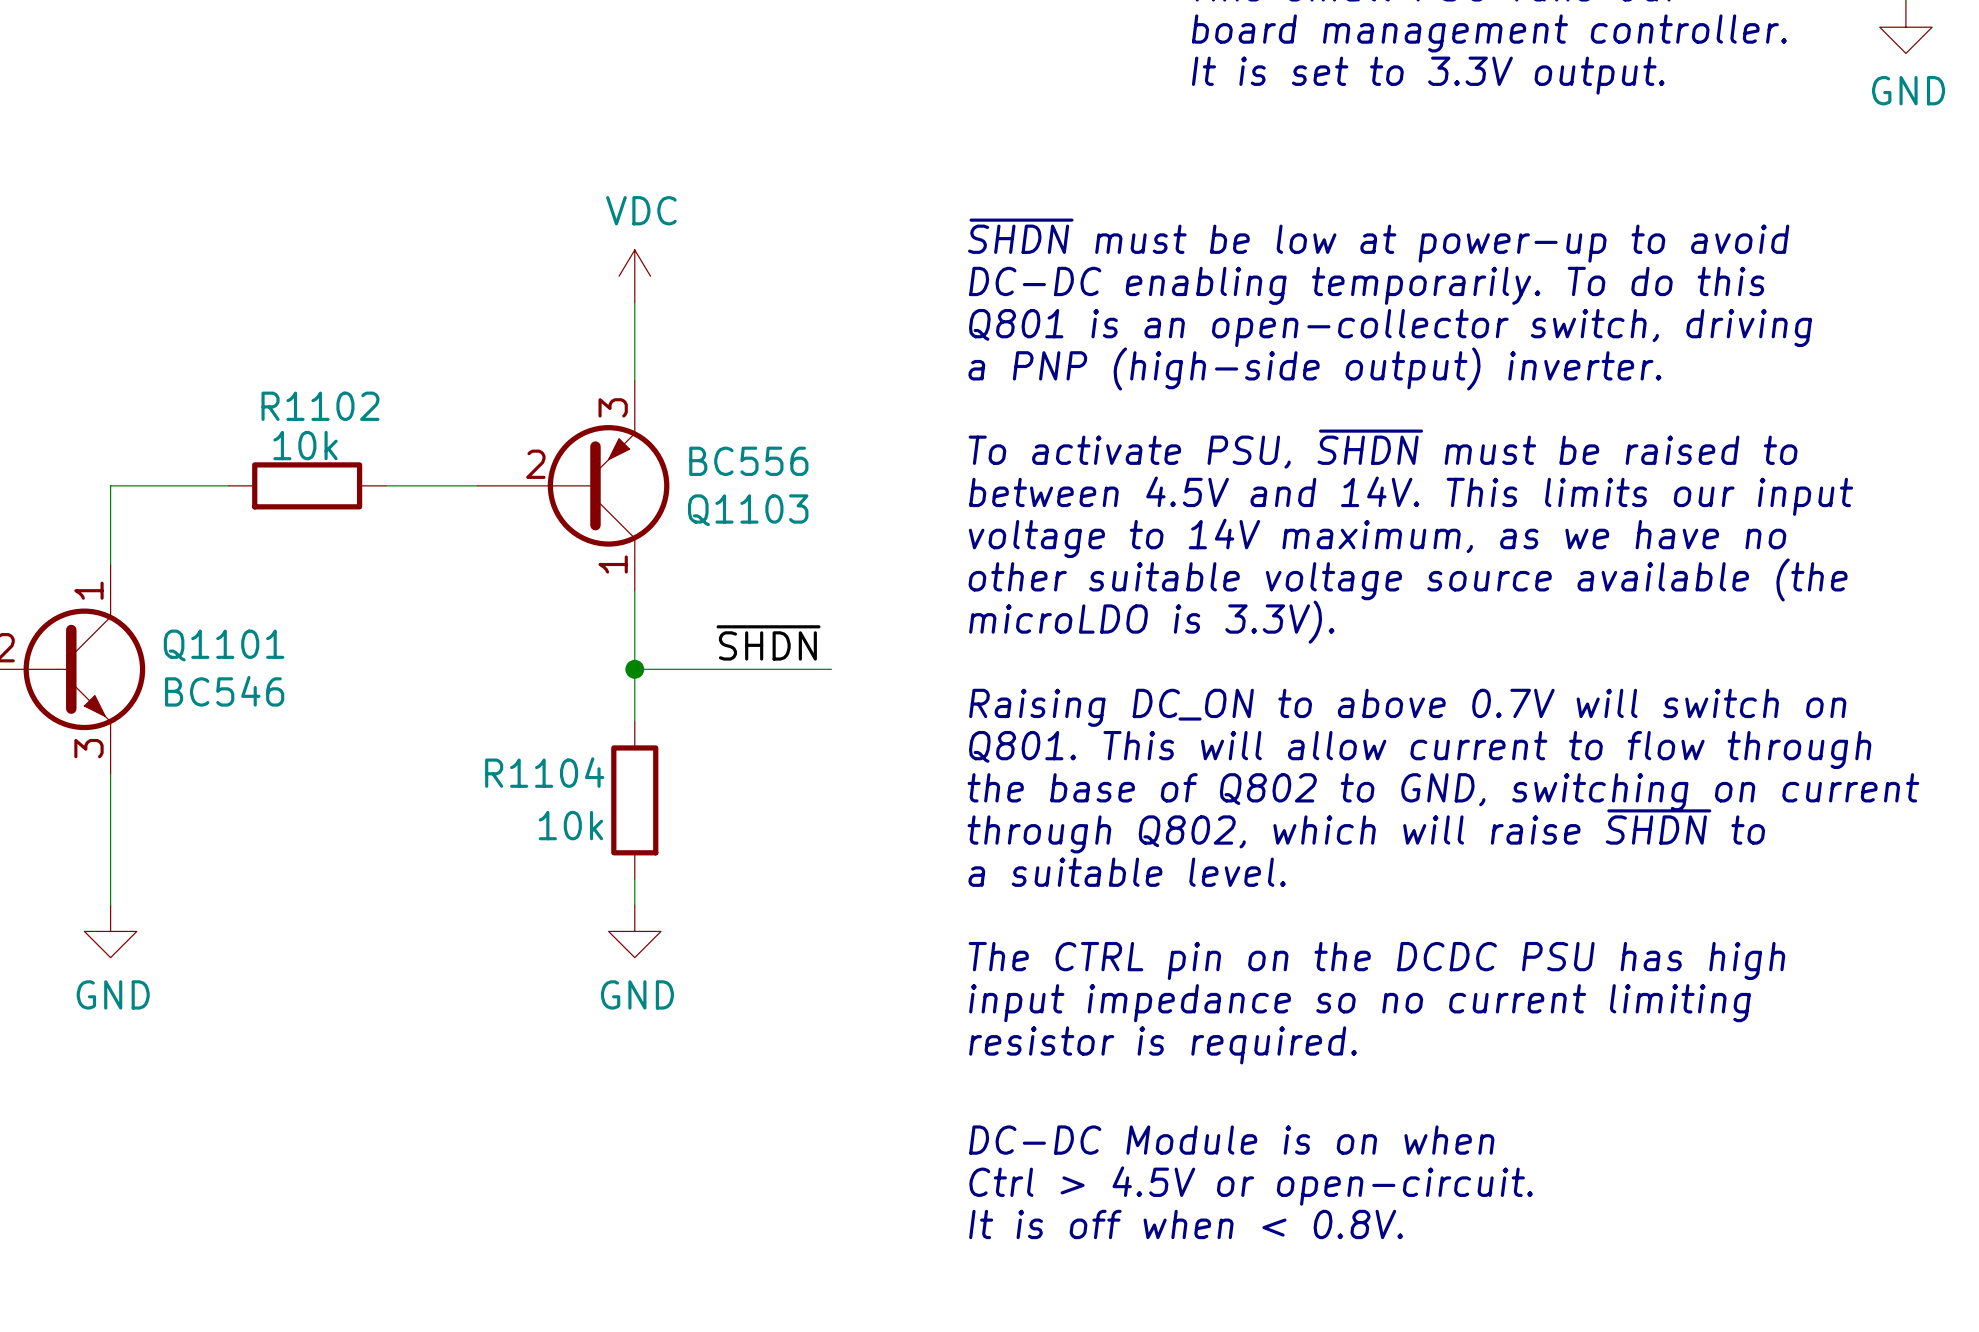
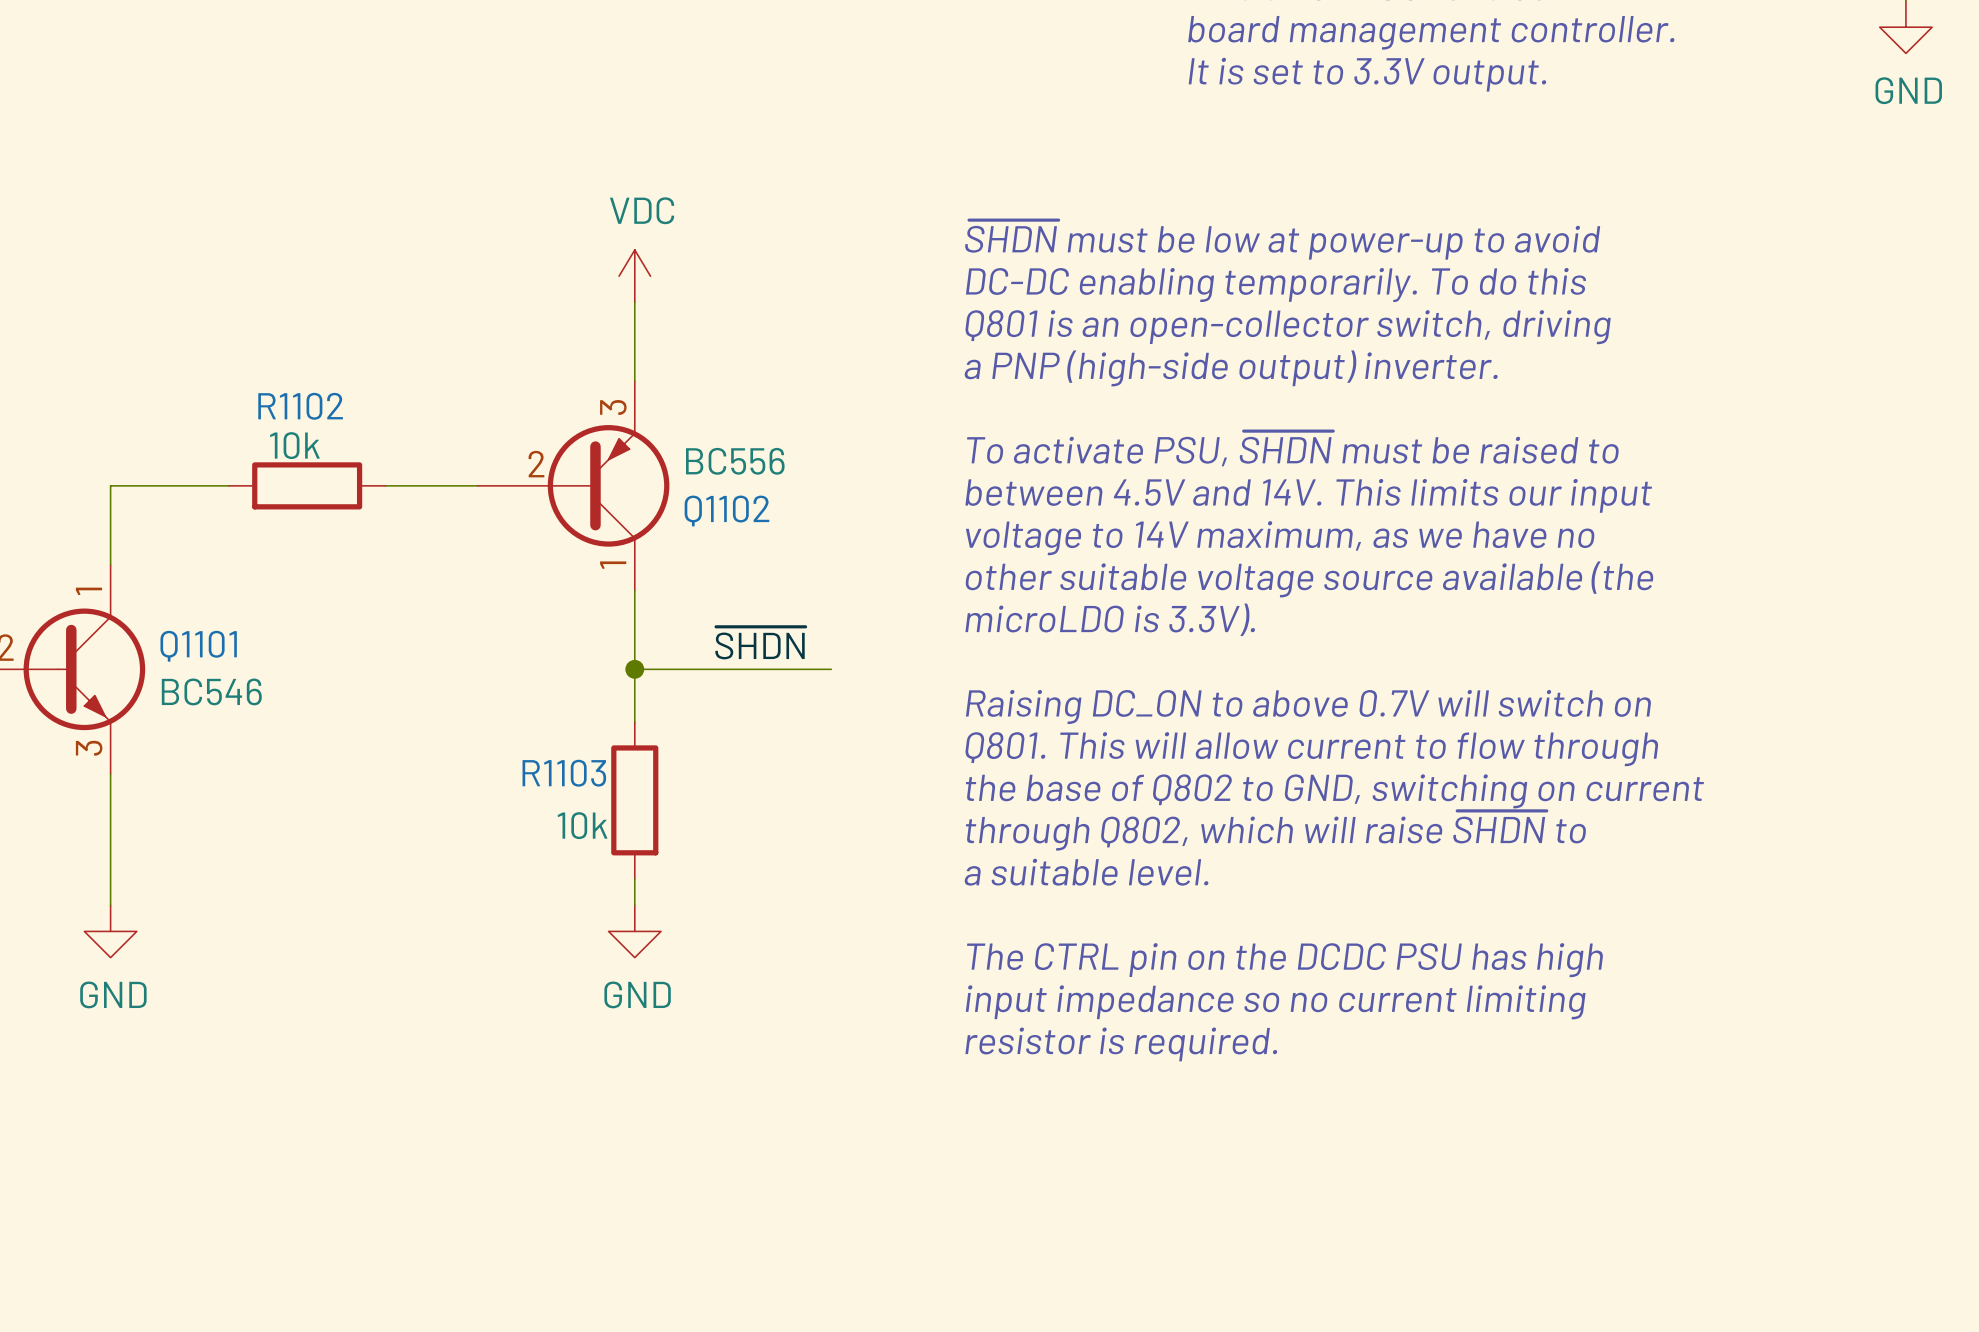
Q1103 name: Q1103 (748, 510) -> Q1102 (726, 510)
R1104 name: R1104 (544, 772) -> R1103 (564, 773)
text: DC-DC Module is on when (1231, 1140) -> none
text: Ctrl > 4.5V or open-circuit. (1251, 1186) -> none
text: It is off when < 0.8V. (1186, 1224) -> none

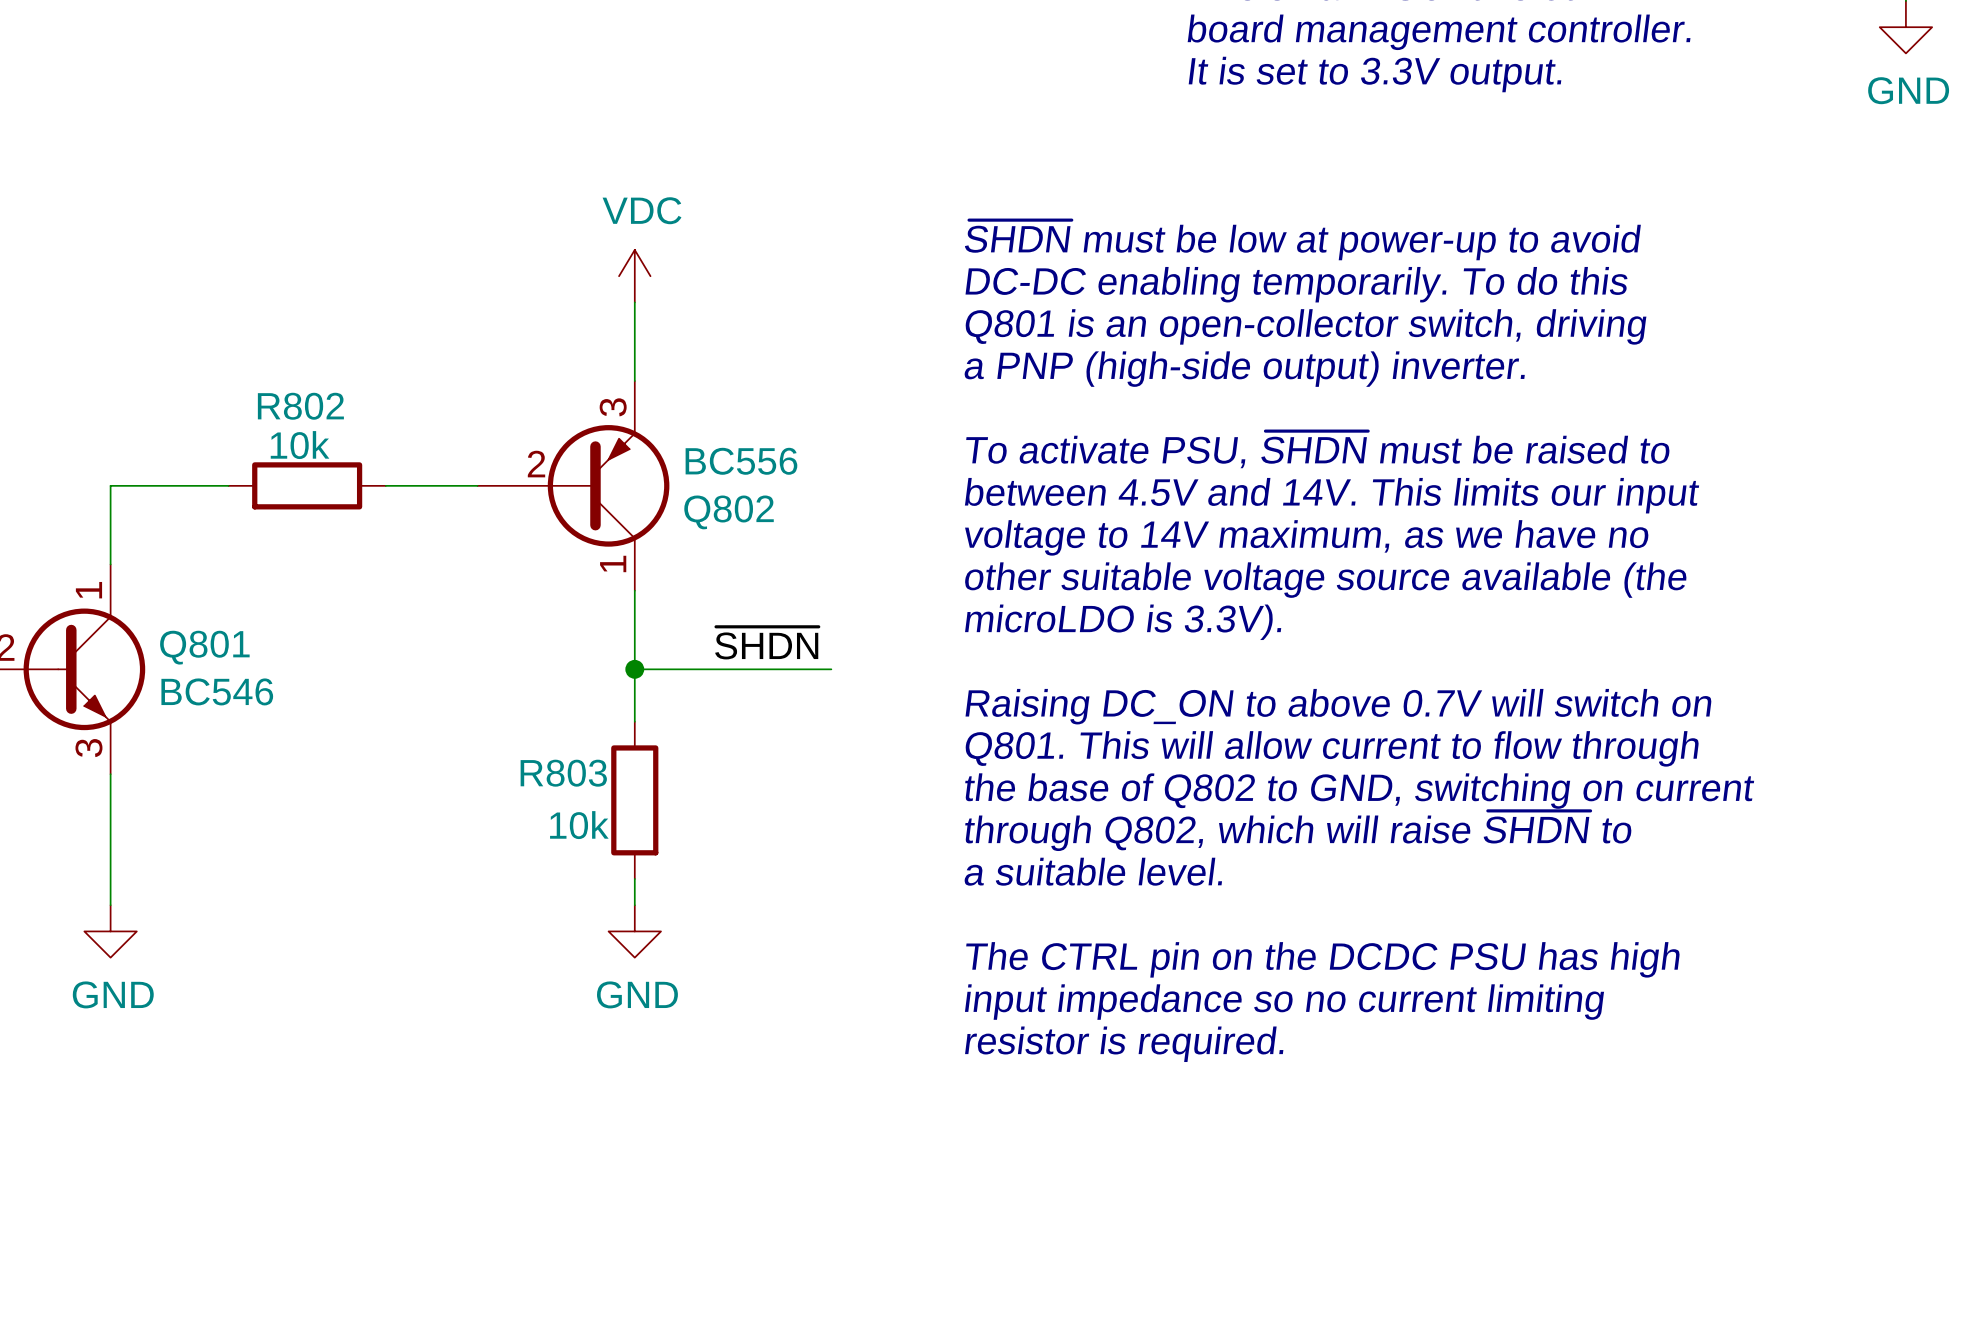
R1102 name: R1102 (300, 406) -> R802 (300, 406)
Q1102 name: Q1102 (726, 510) -> Q802 (729, 512)
Q1101 name: Q1101 (198, 646) -> Q801 (204, 647)
R1103 name: R1103 (564, 773) -> R803 (563, 773)

